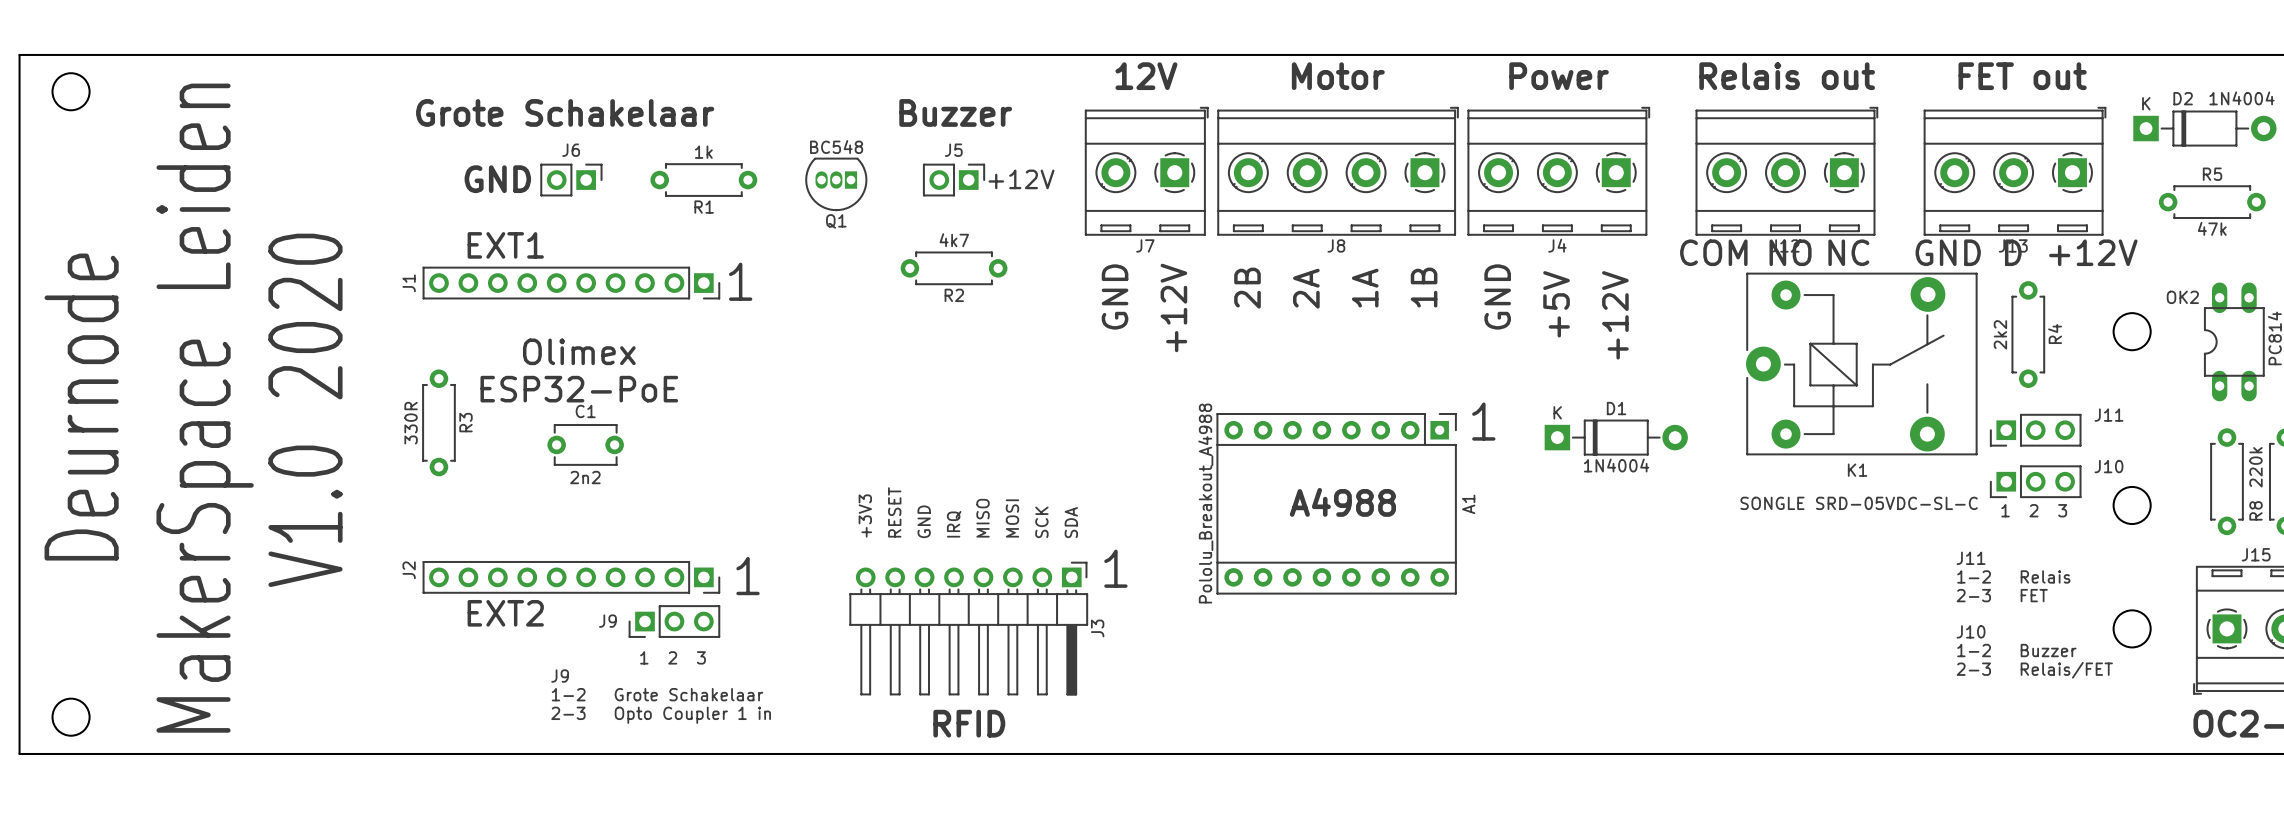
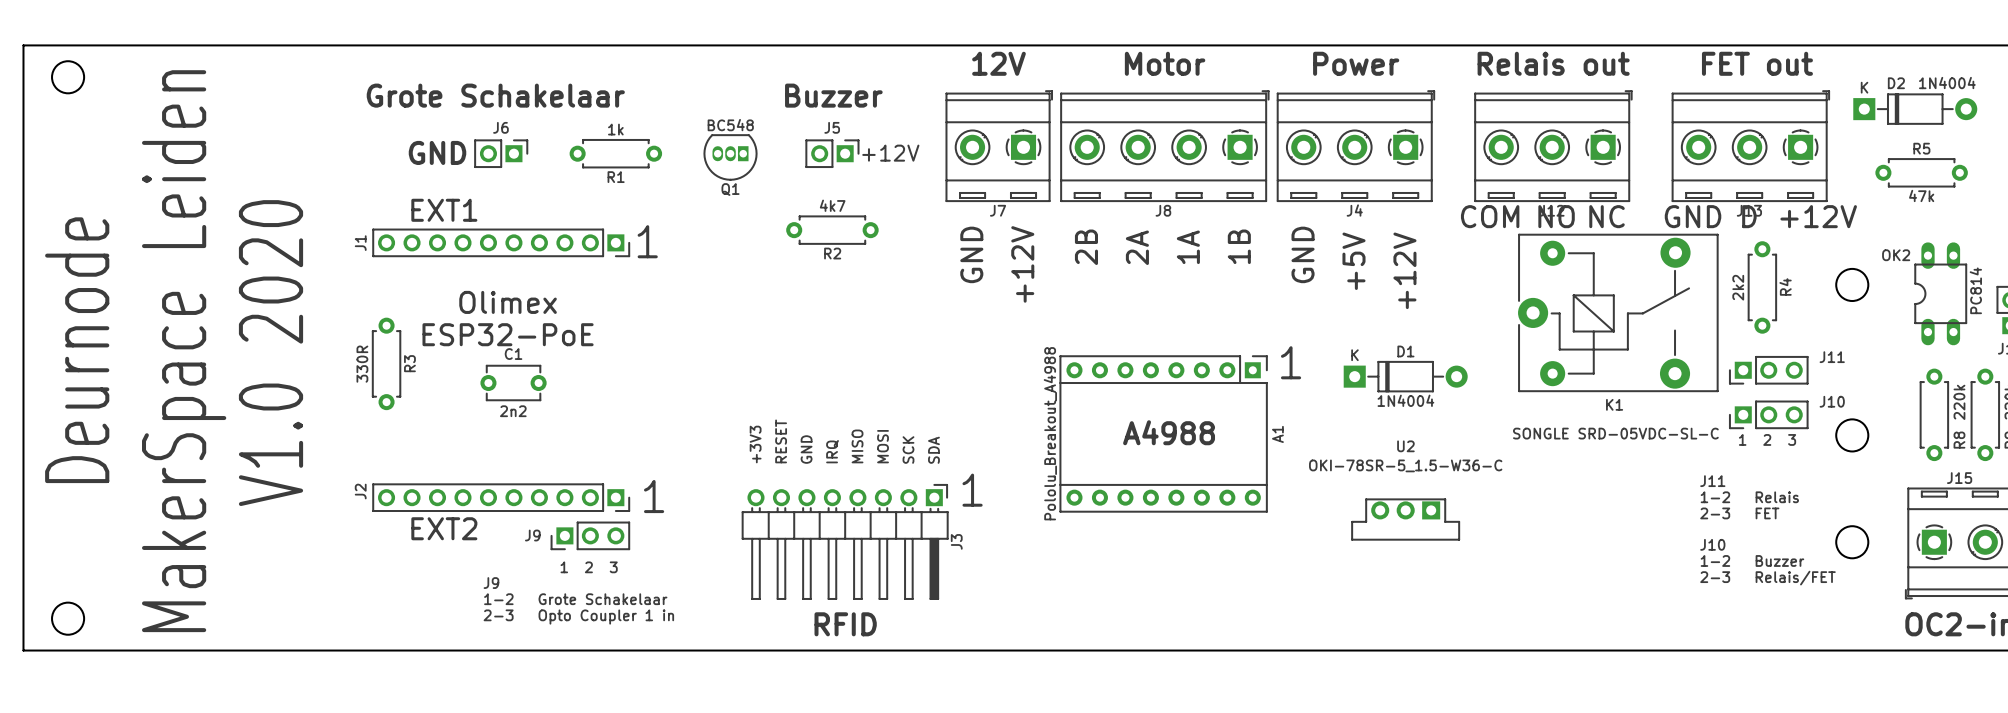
U2: none -> OKI-78SR-5_1.5-W36-C (1405, 519)

